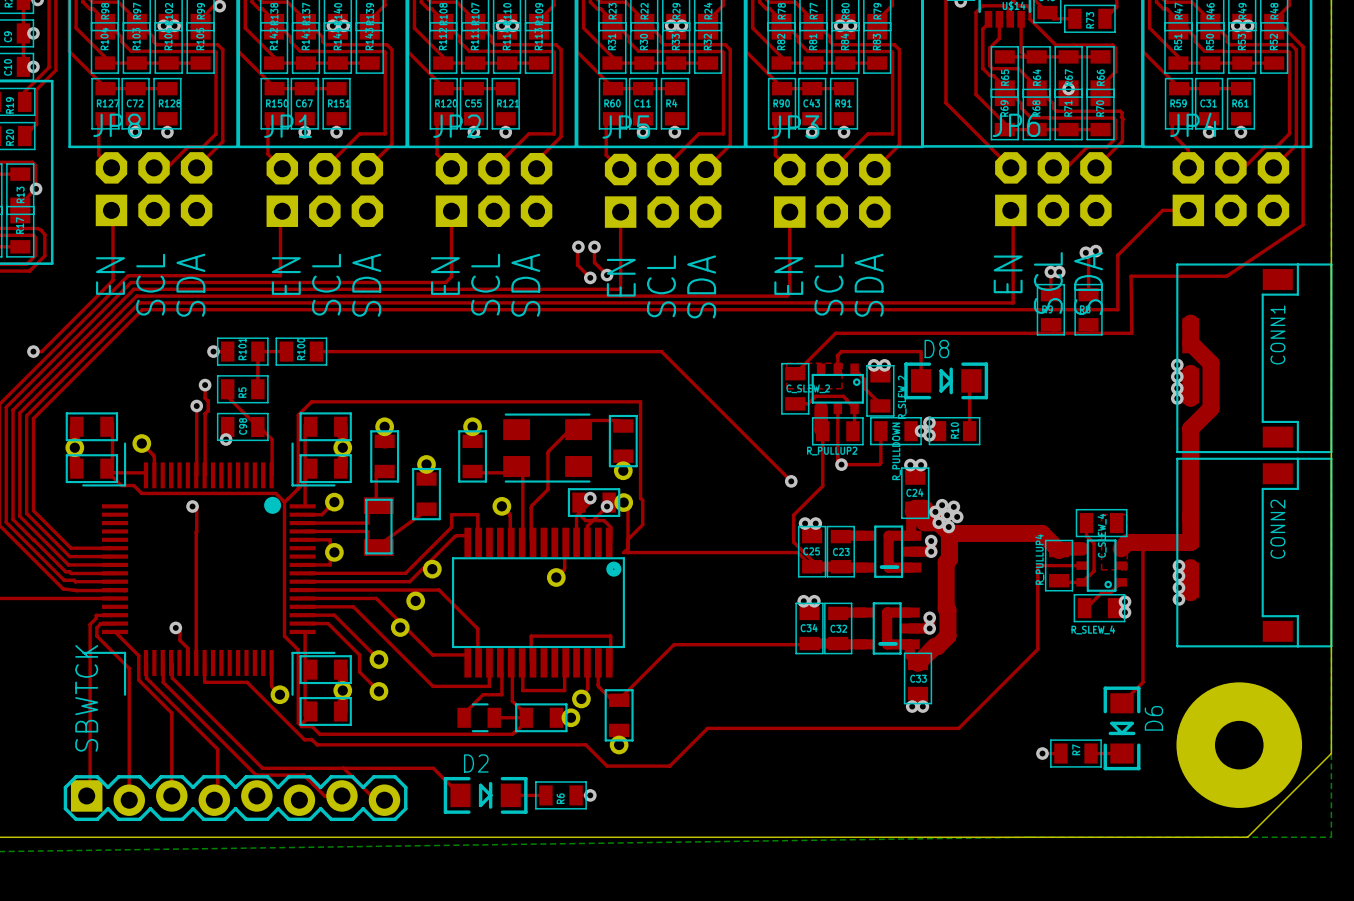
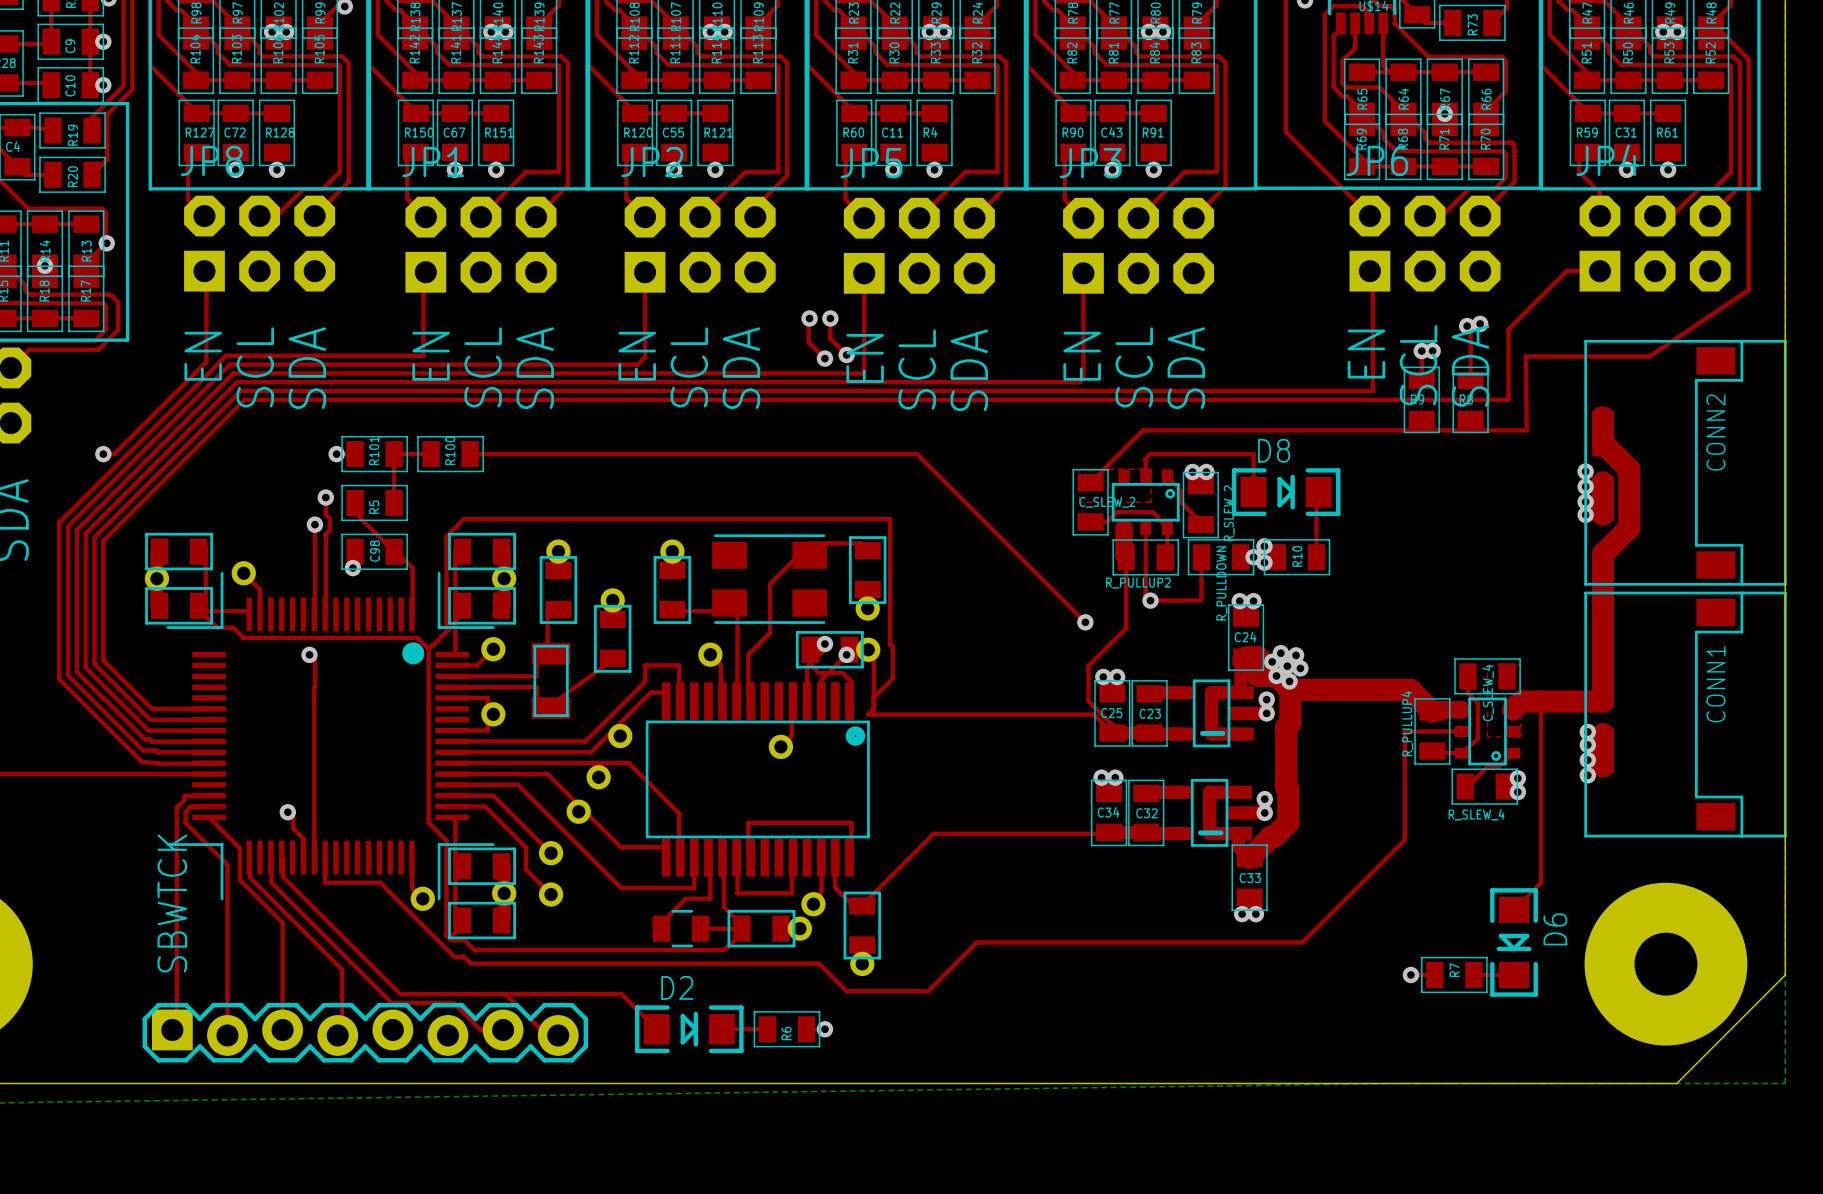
CONN1 name: CONN1 (1277, 334) -> CONN2 (1716, 432)
CONN2 name: CONN2 (1277, 529) -> CONN1 (1716, 684)

